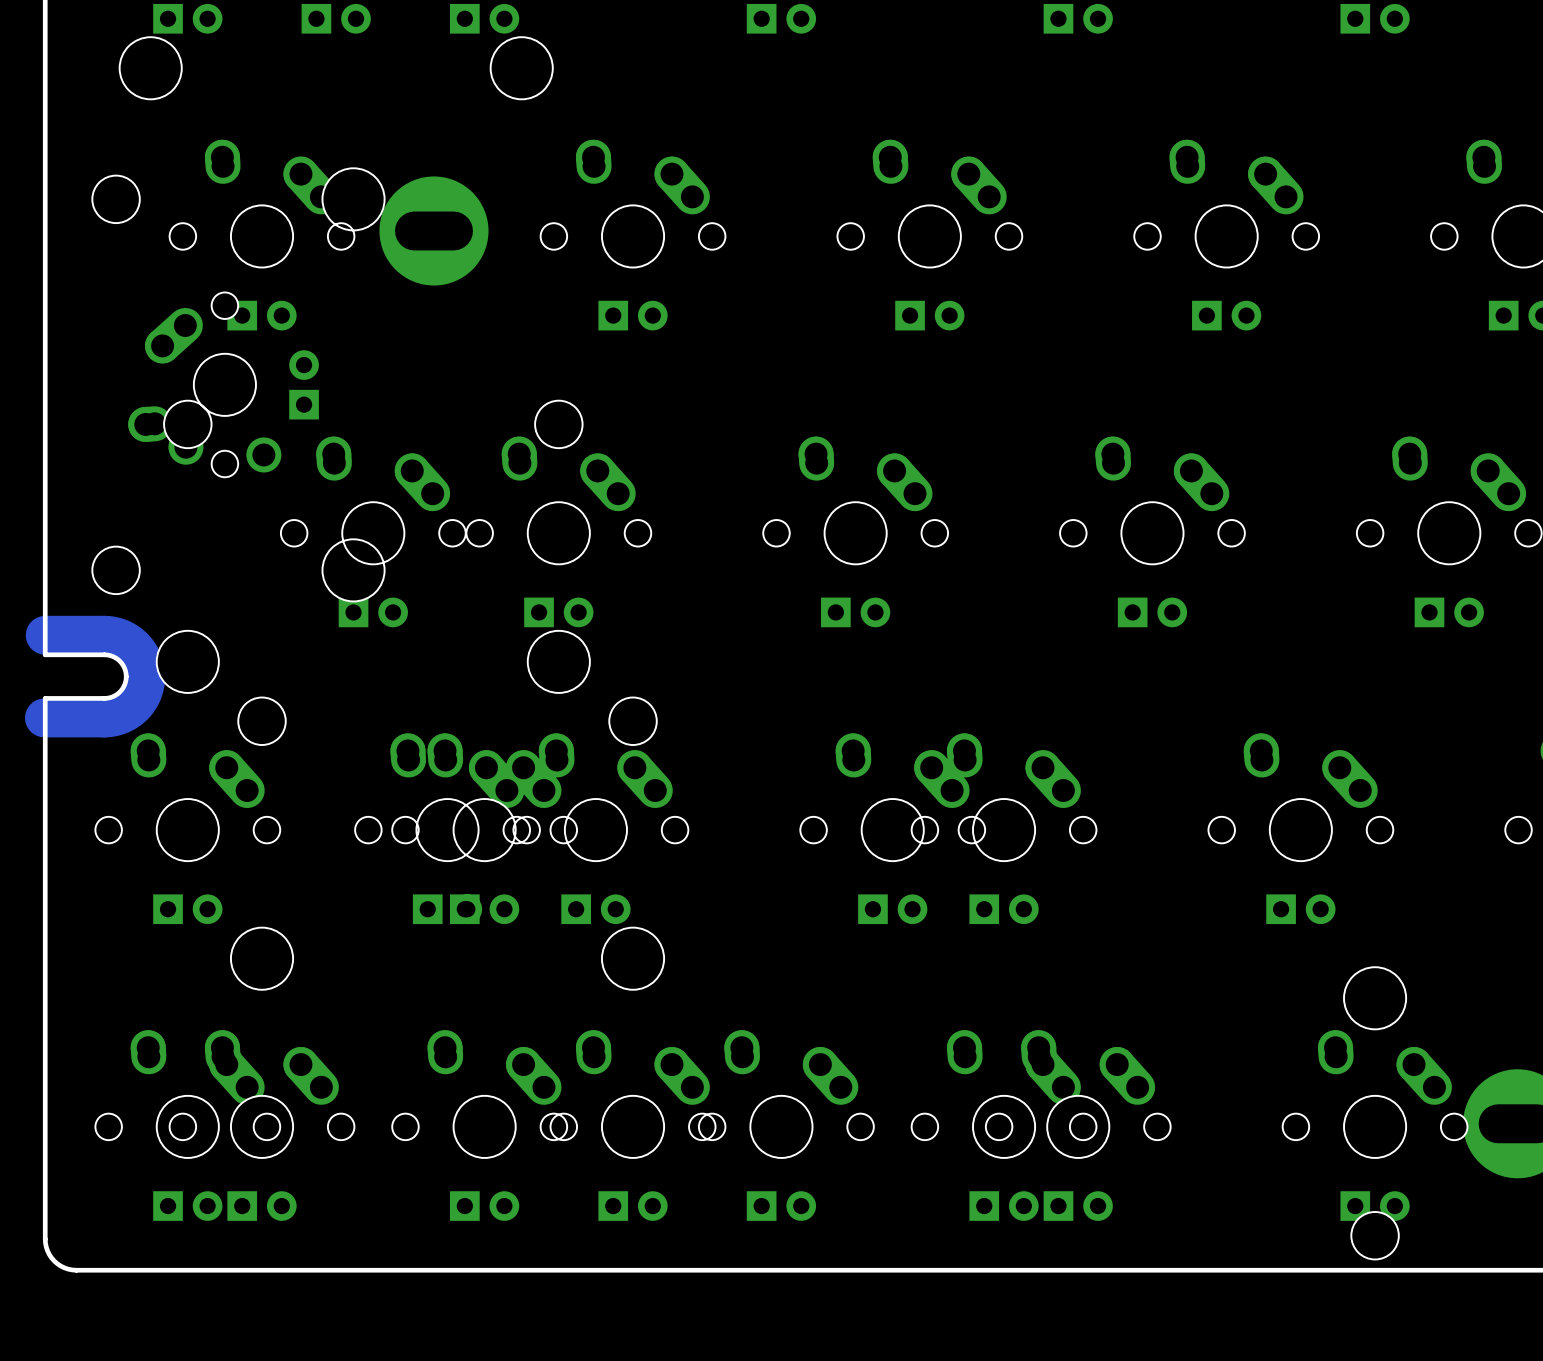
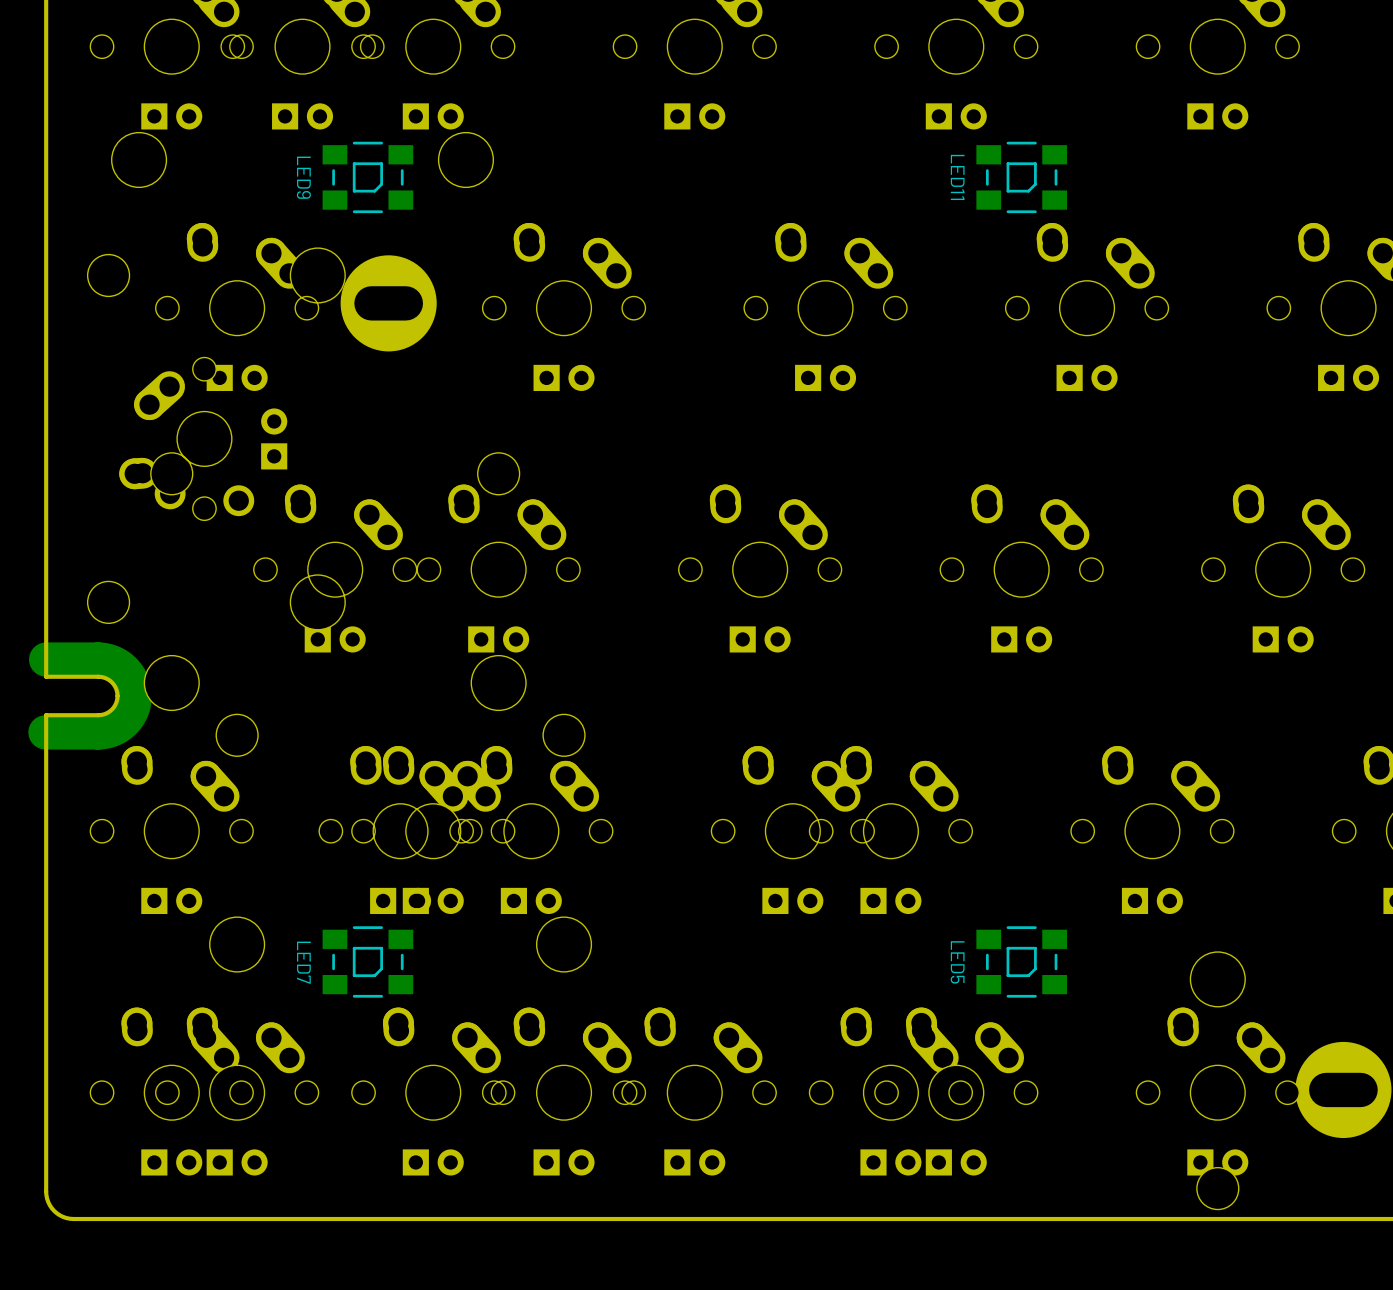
LED9: none -> (367, 177)
LED11: none -> (1021, 177)
LED7: none -> (367, 961)
LED5: none -> (1021, 961)

